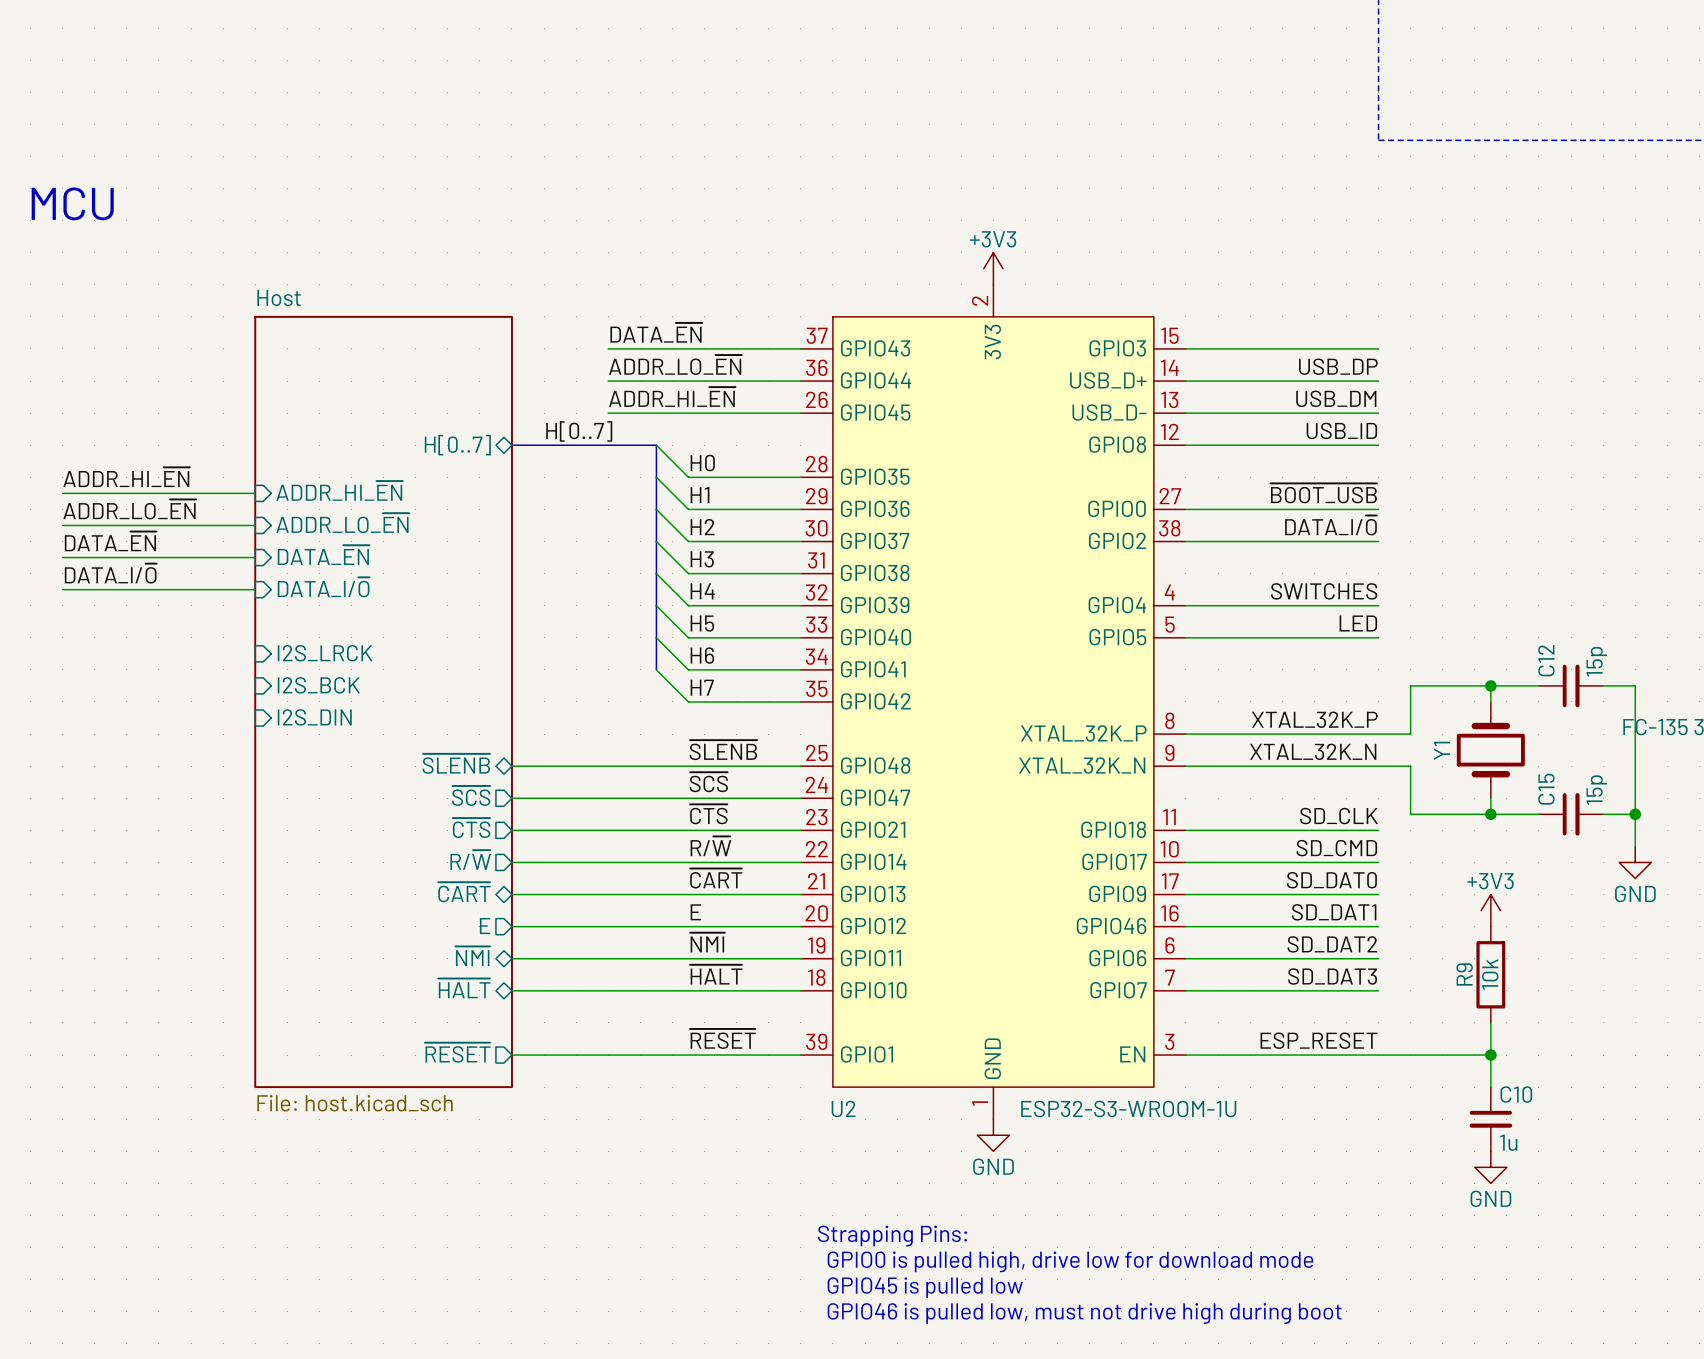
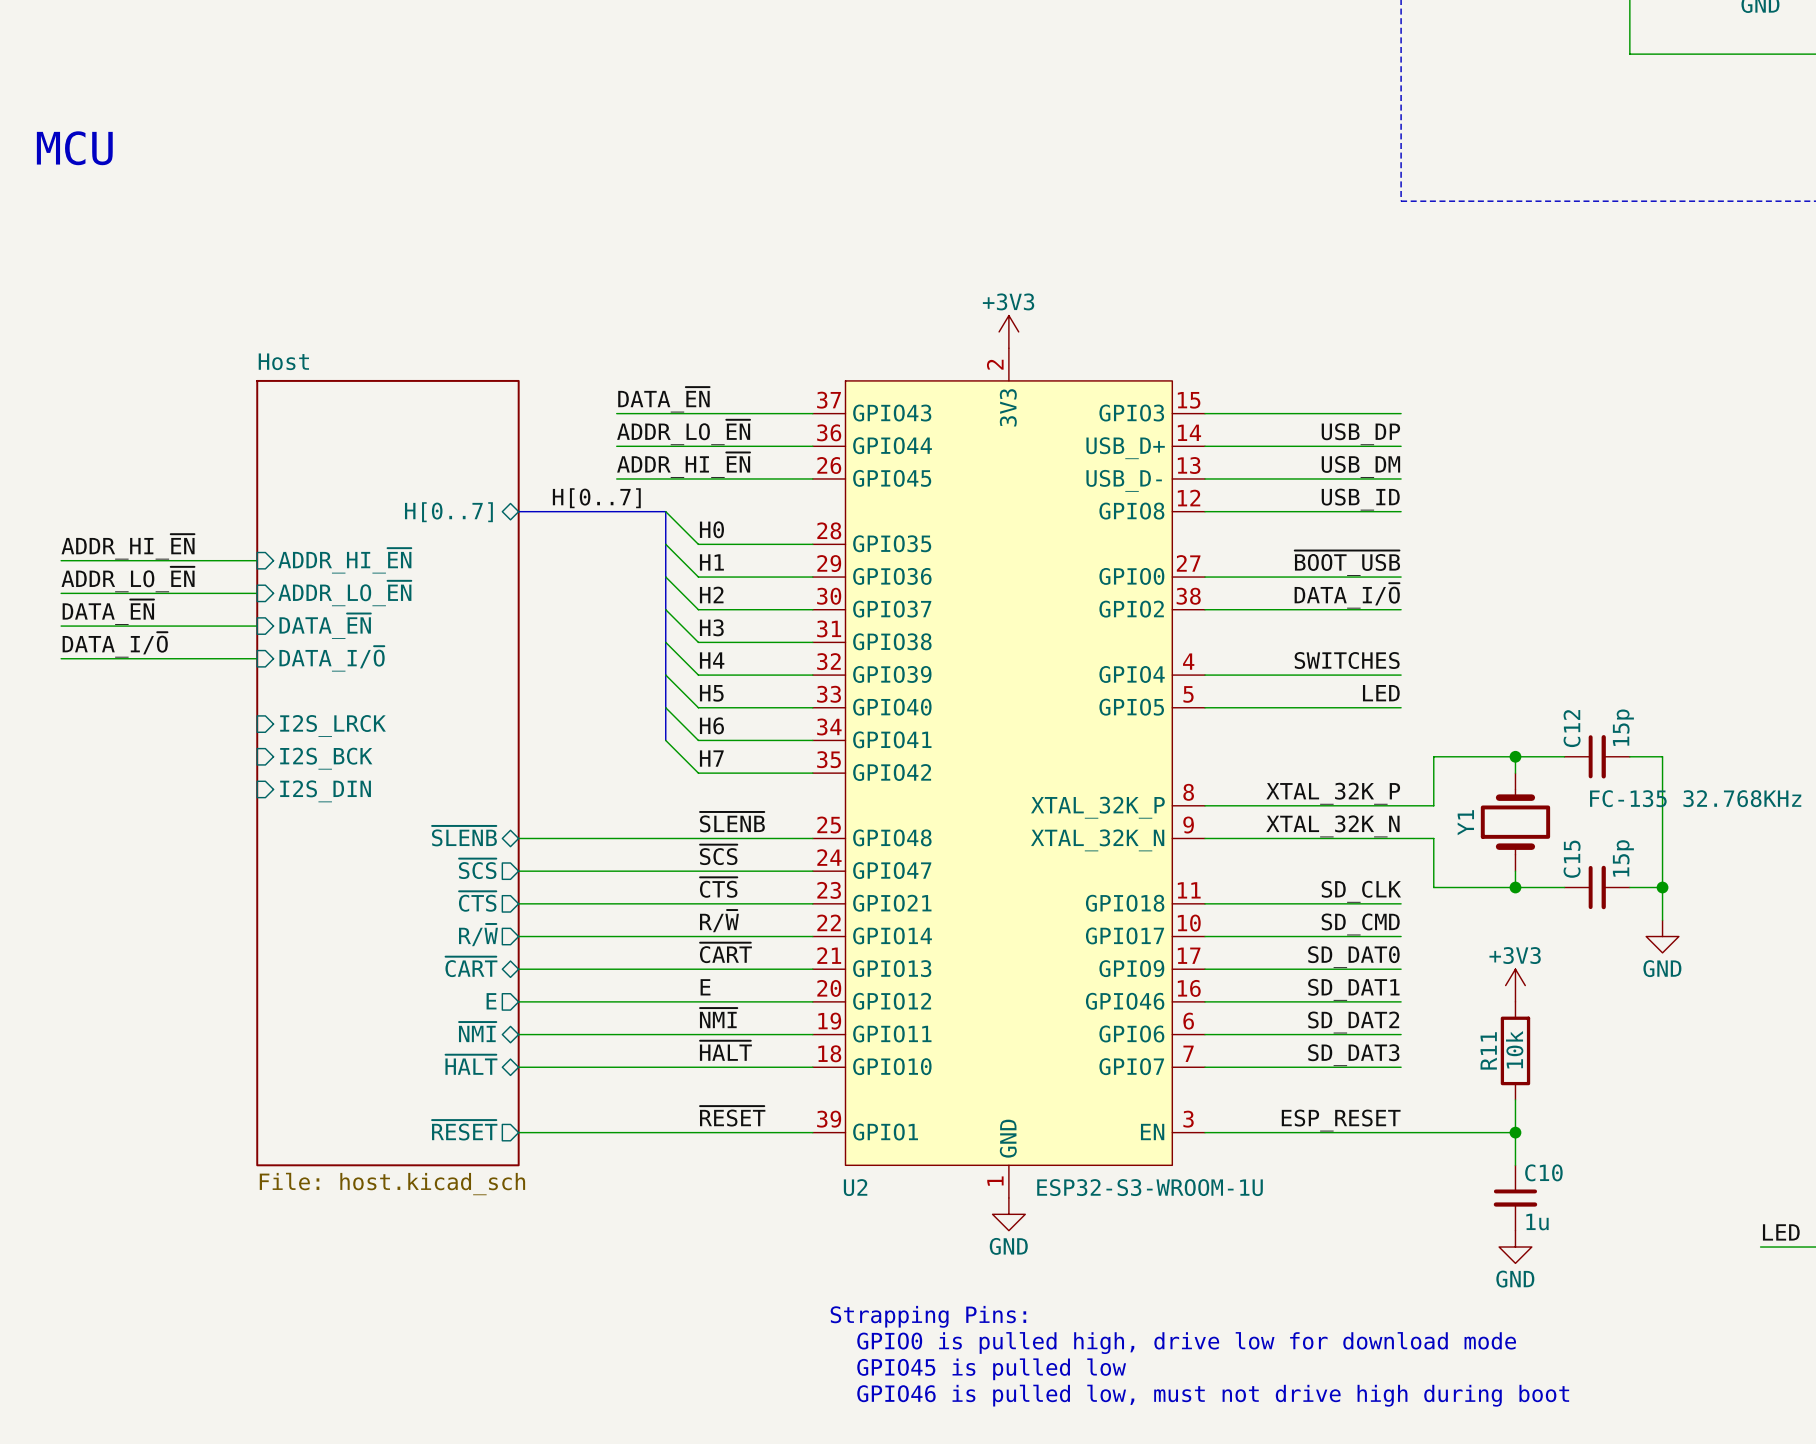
text position: MCU (72, 203) -> MCU (74, 148)
R9 name: R9 (1464, 974) -> R11 (1488, 1050)

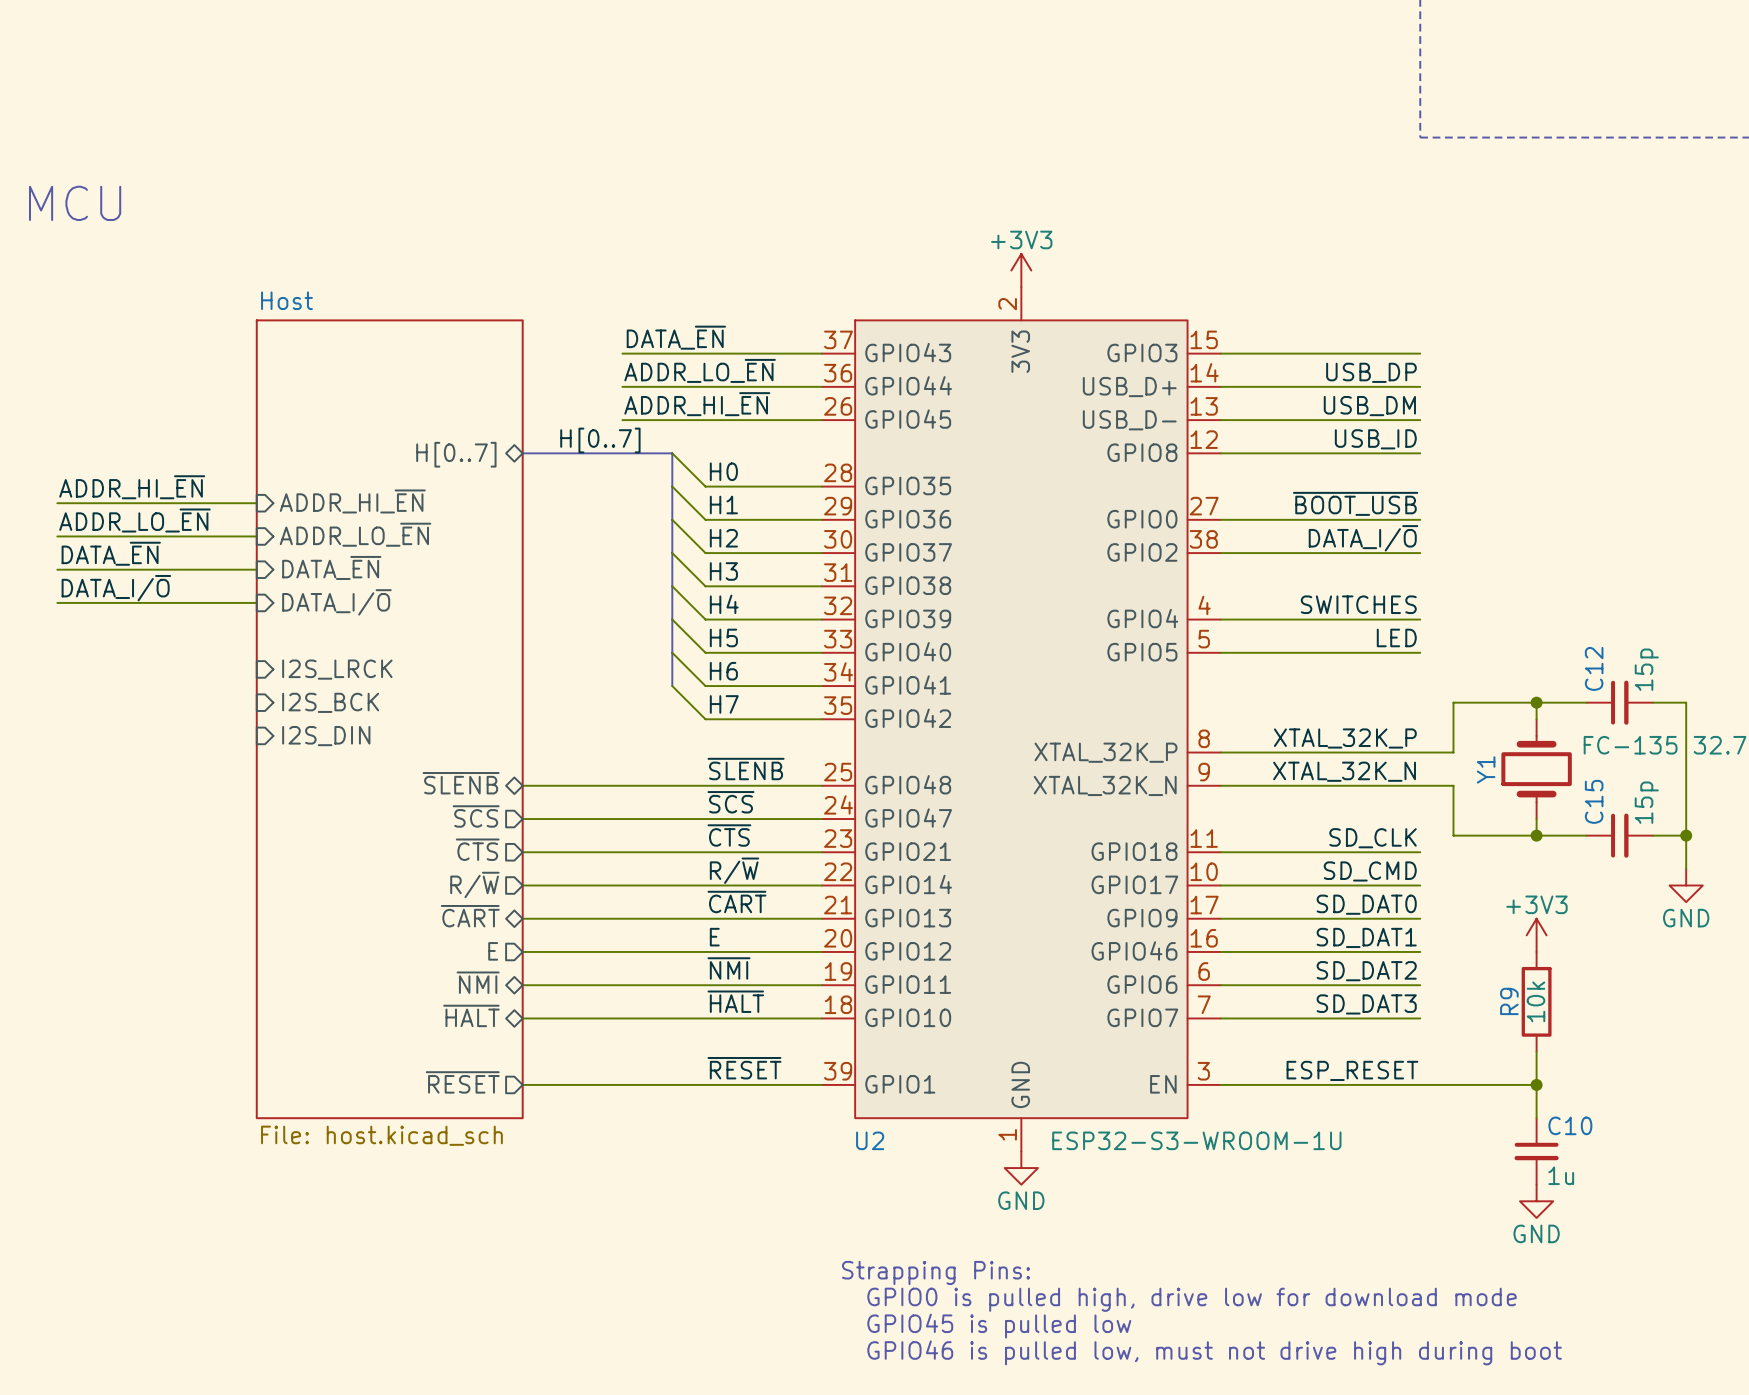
text position: MCU (74, 148) -> MCU (75, 203)
R11 name: R11 (1488, 1050) -> R9 (1509, 1001)

